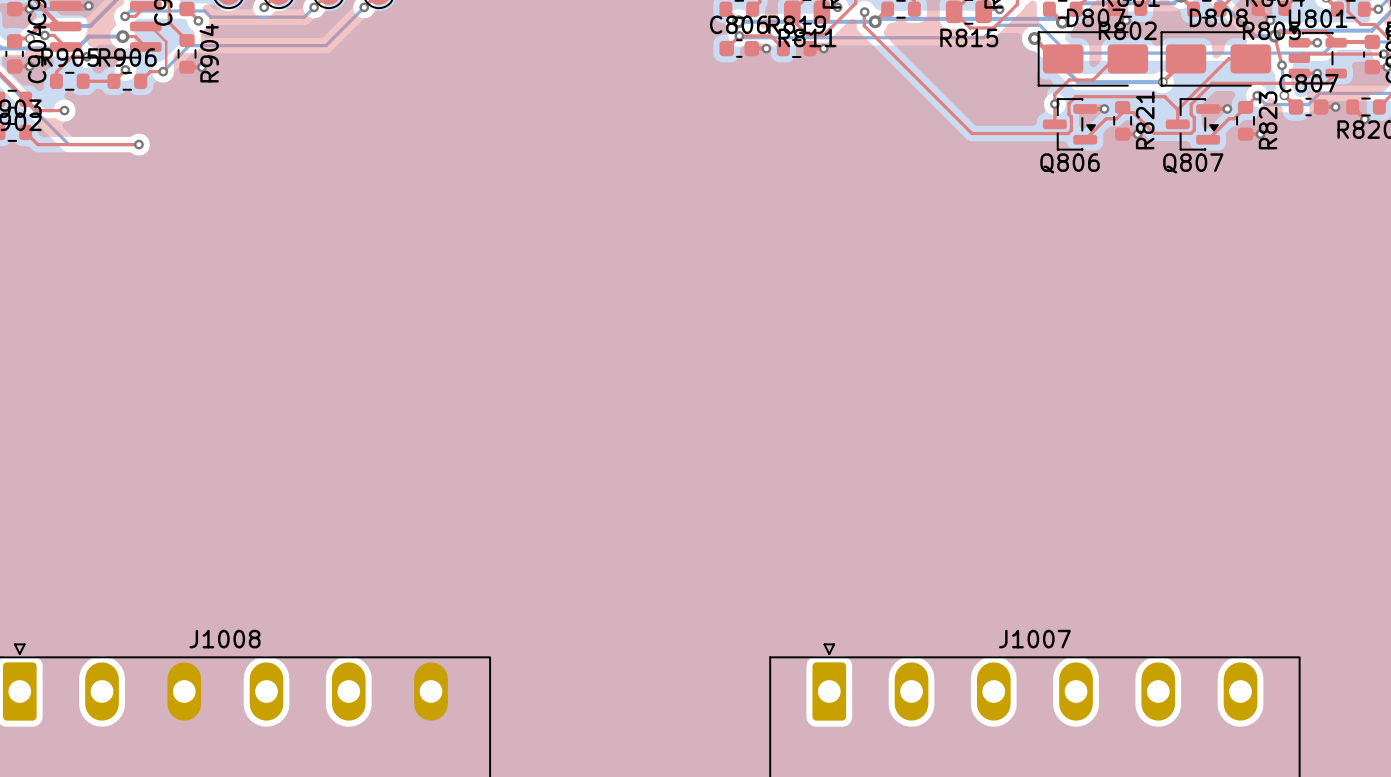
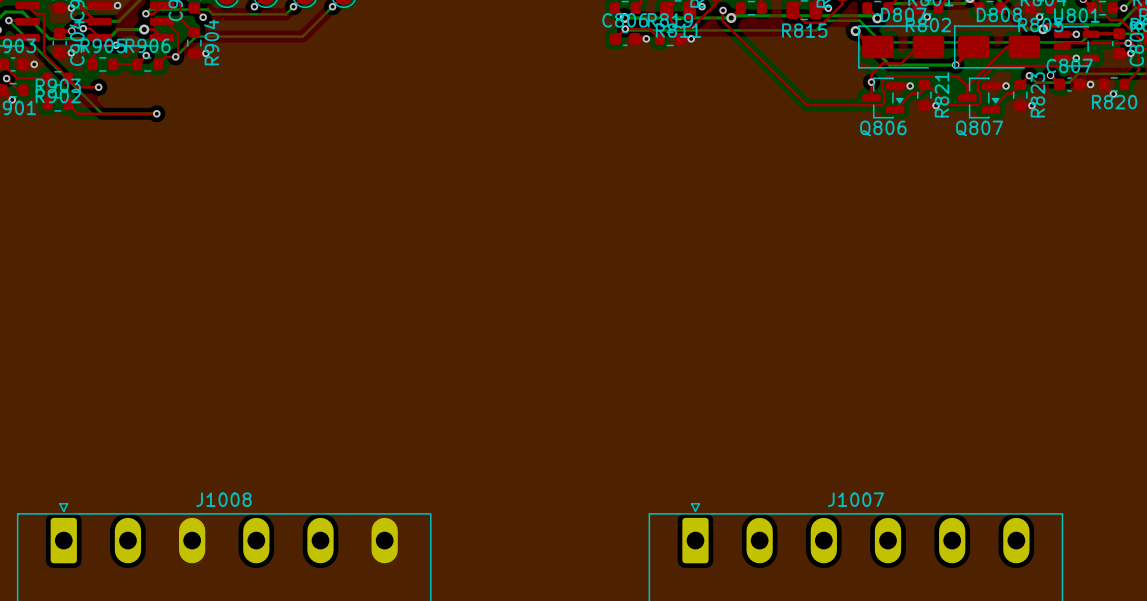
top track: (1274, 36) (1282, 65) -> none
bottom track: (1282, 65) (1284, 95) -> none
via: (1282, 65) -> none

